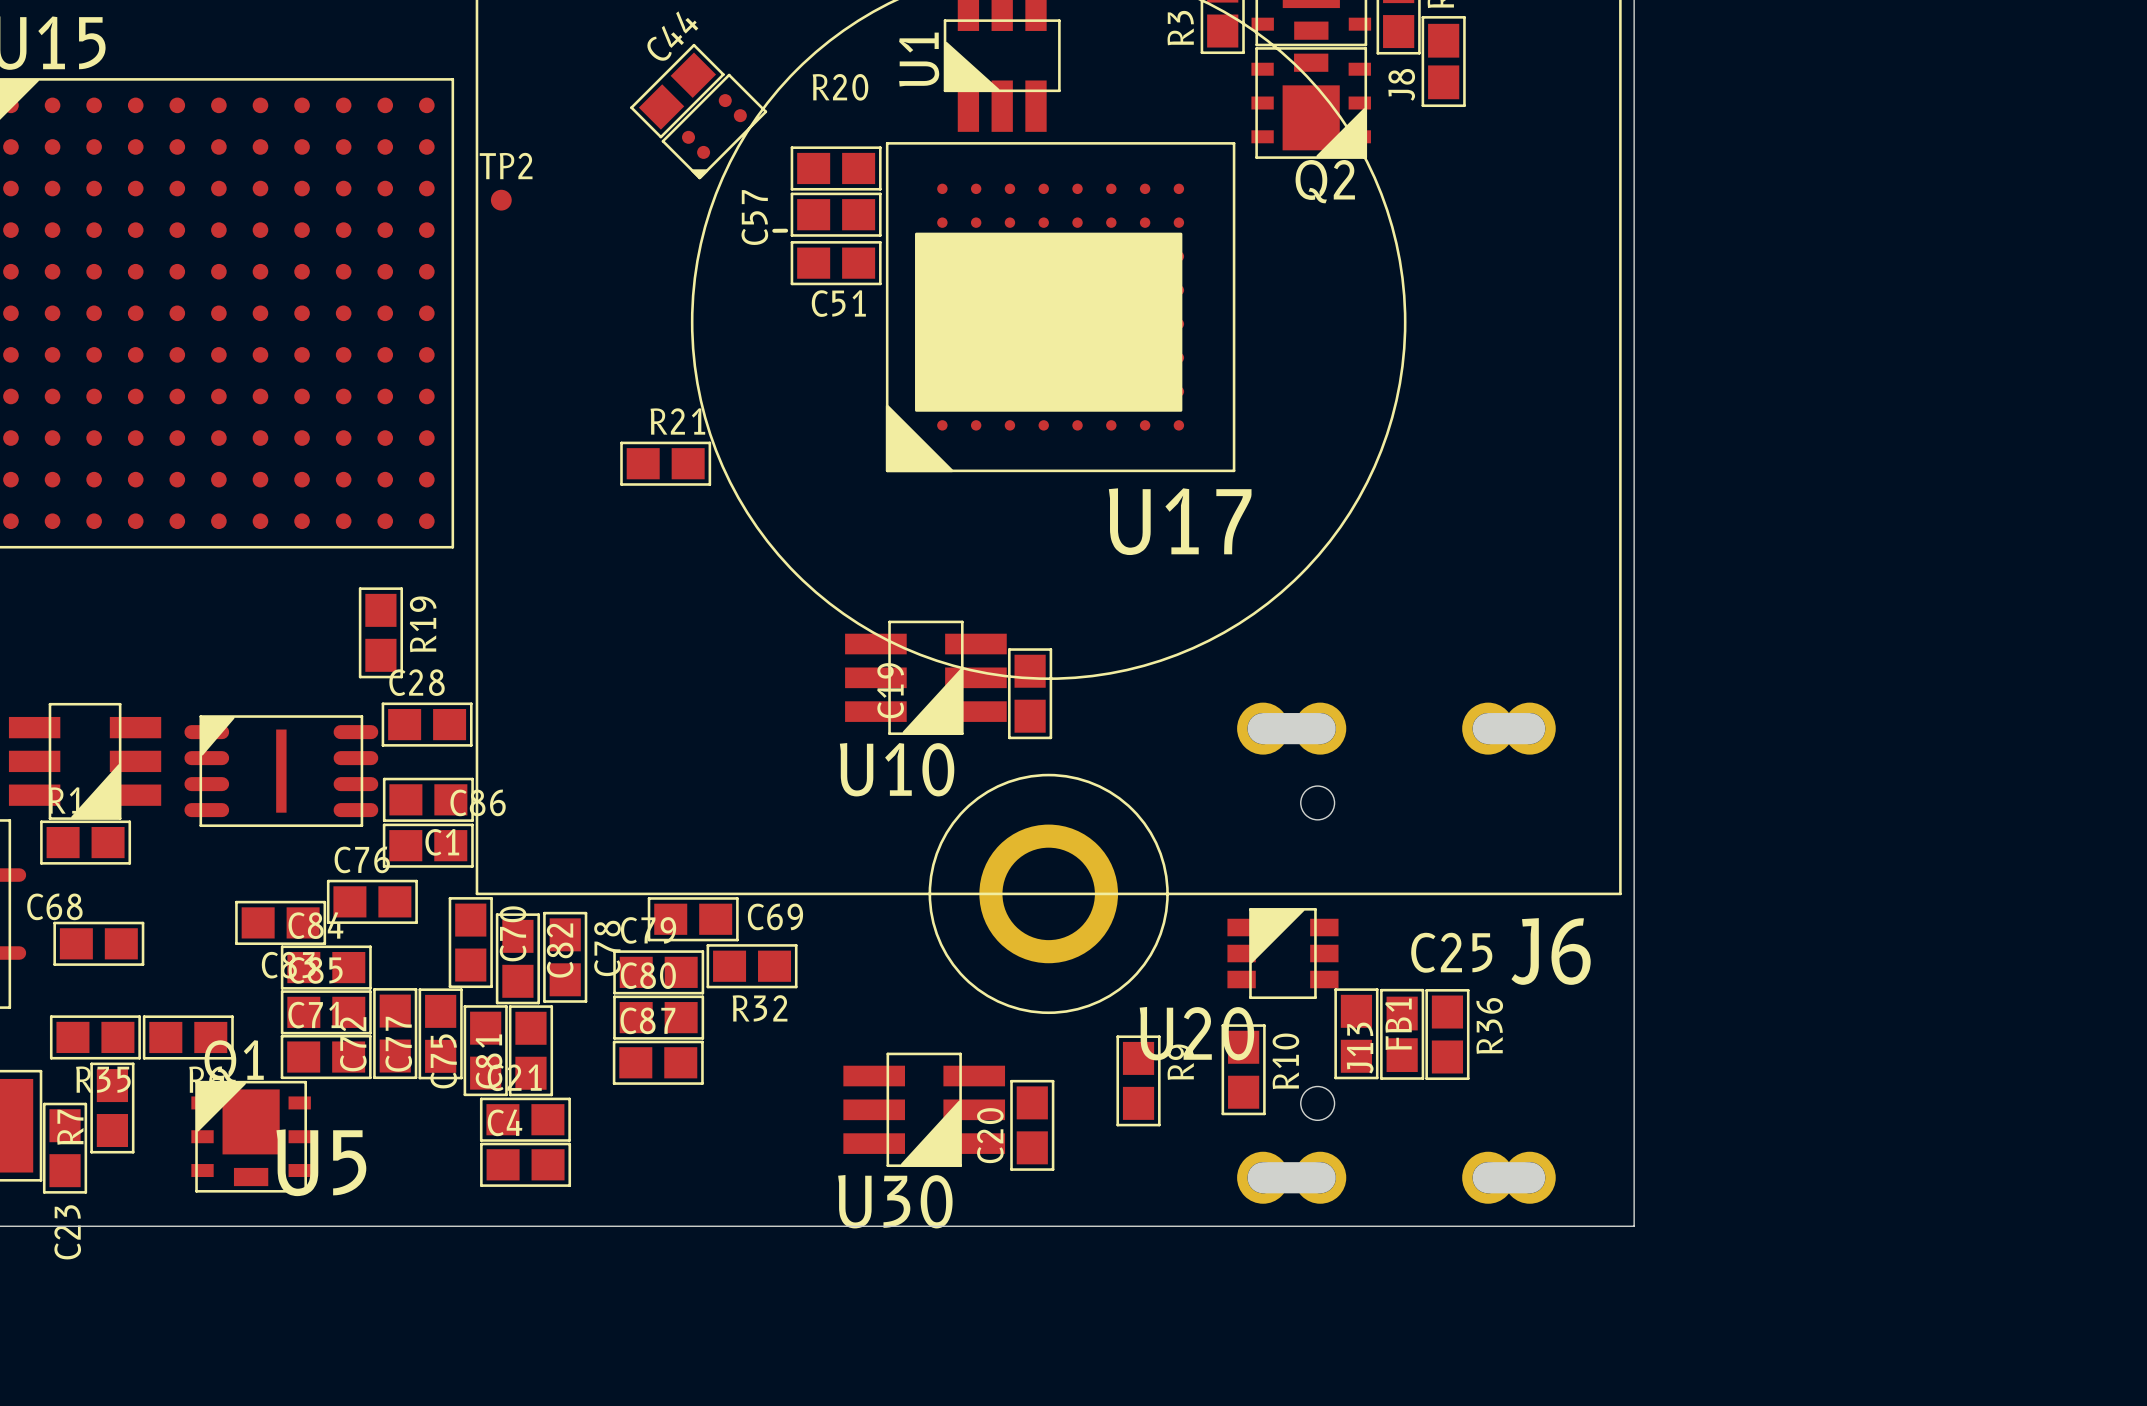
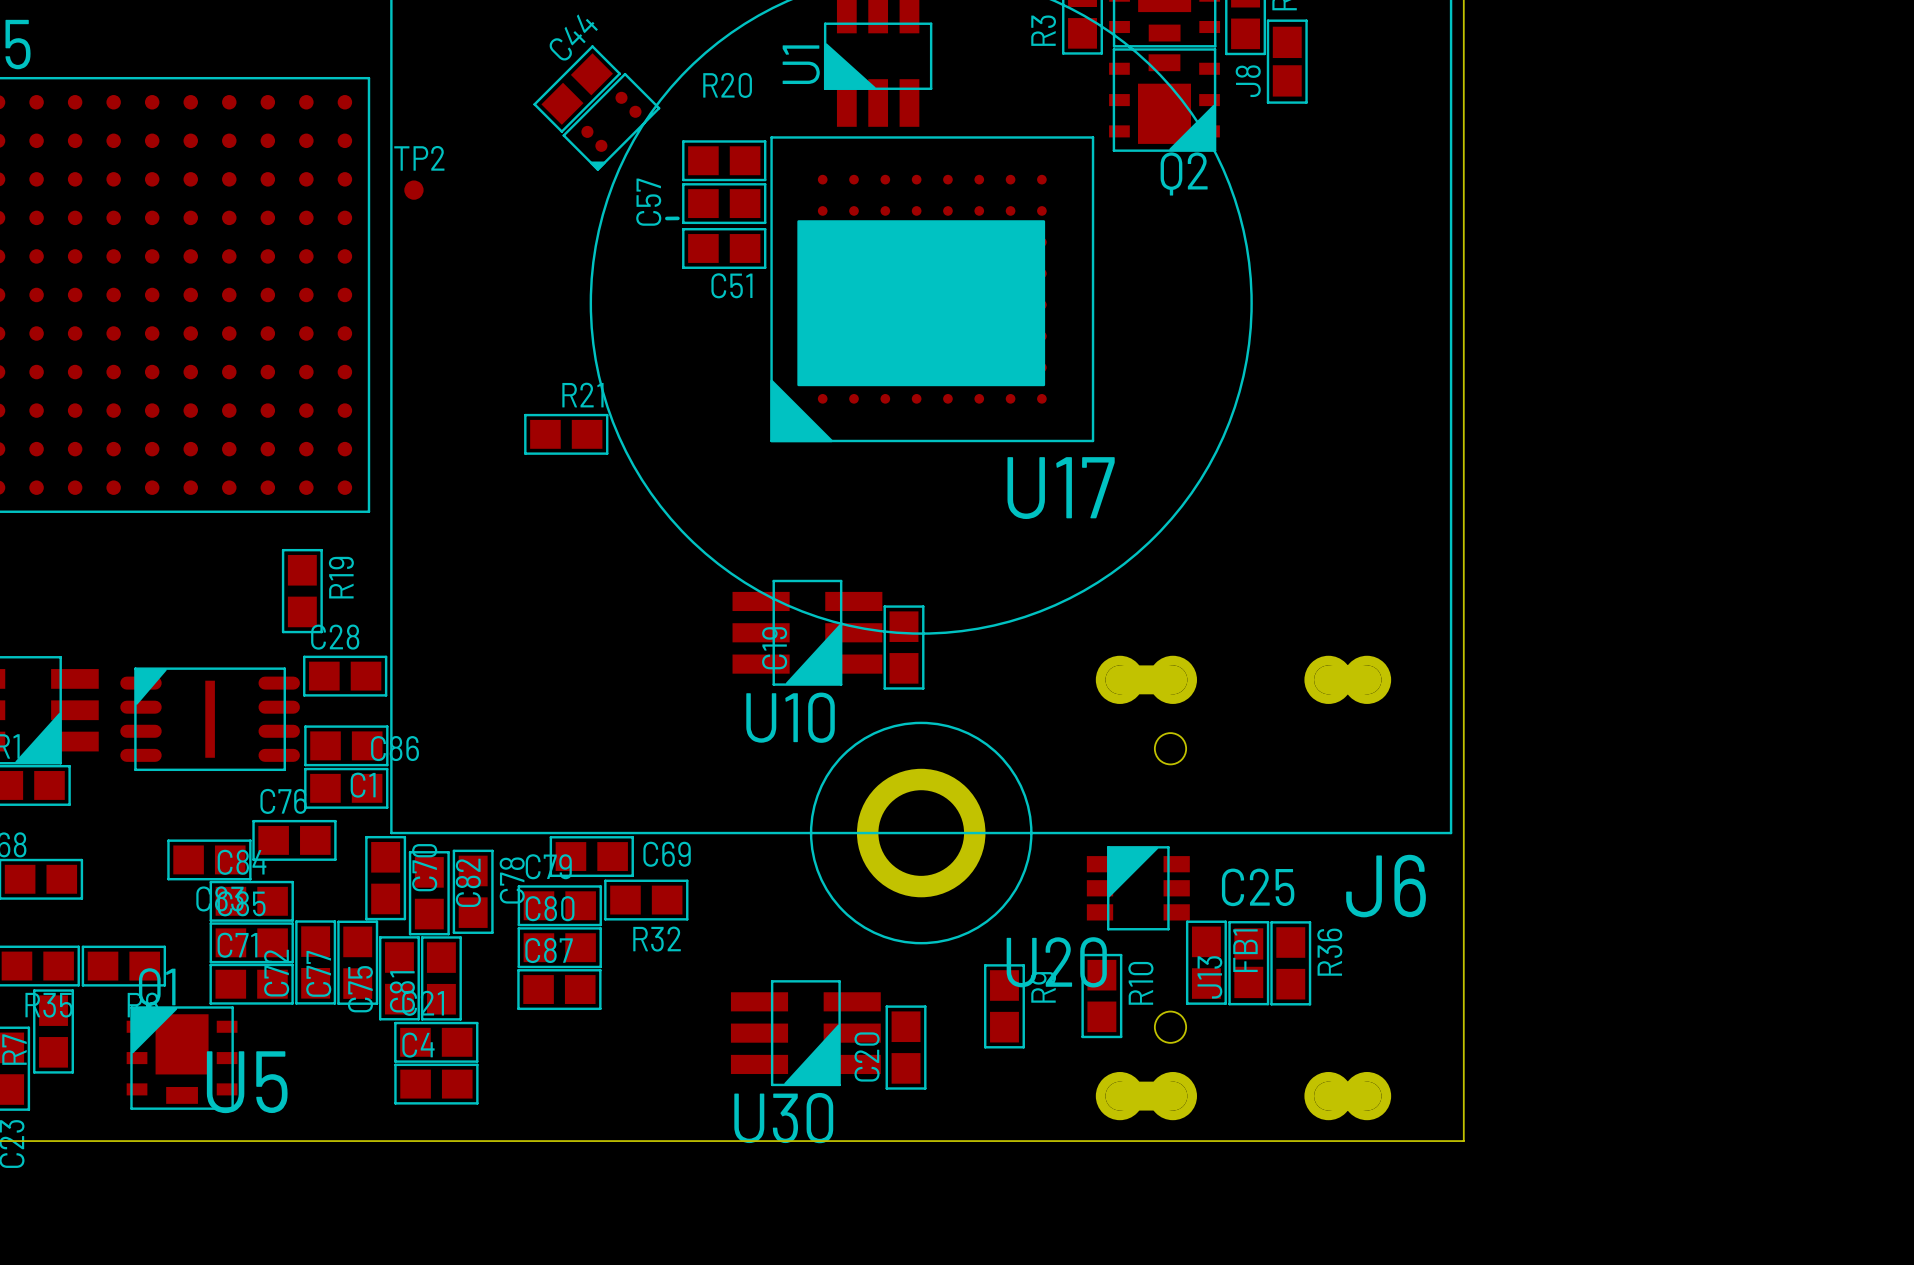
C25 position: (1451, 952) -> (1258, 887)

